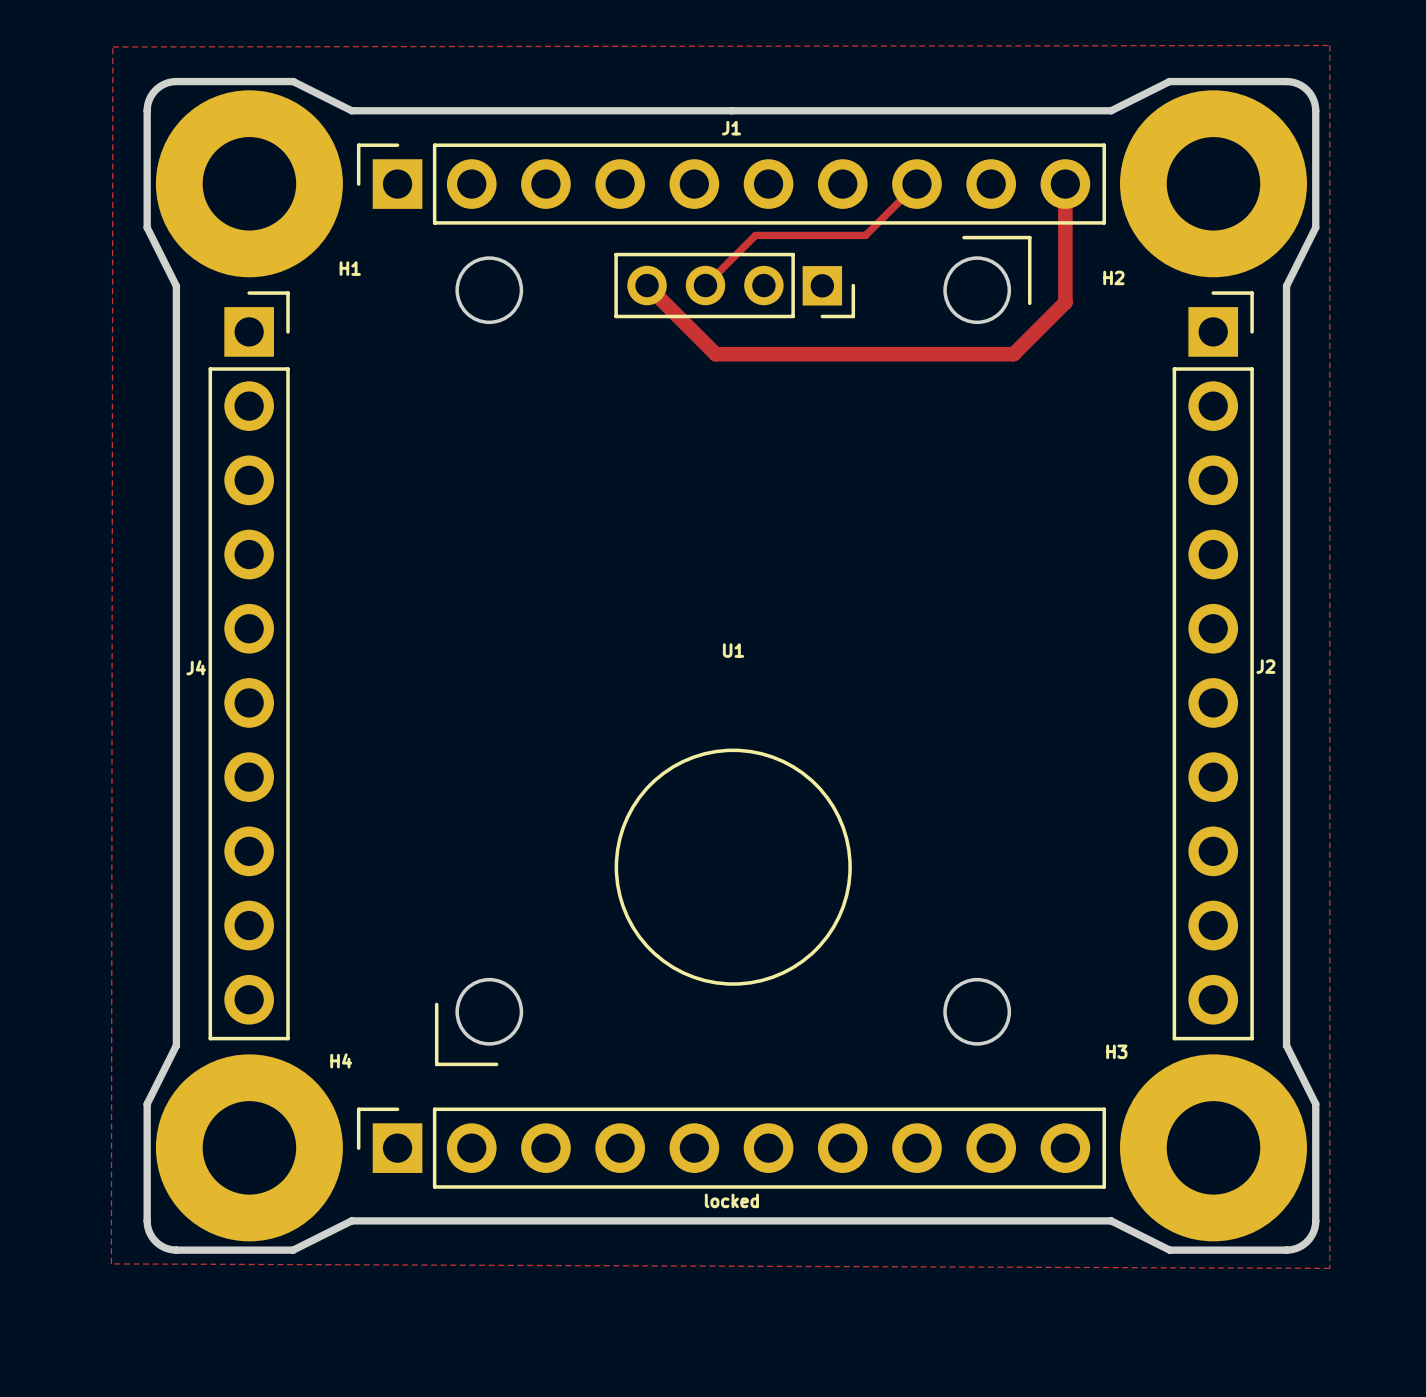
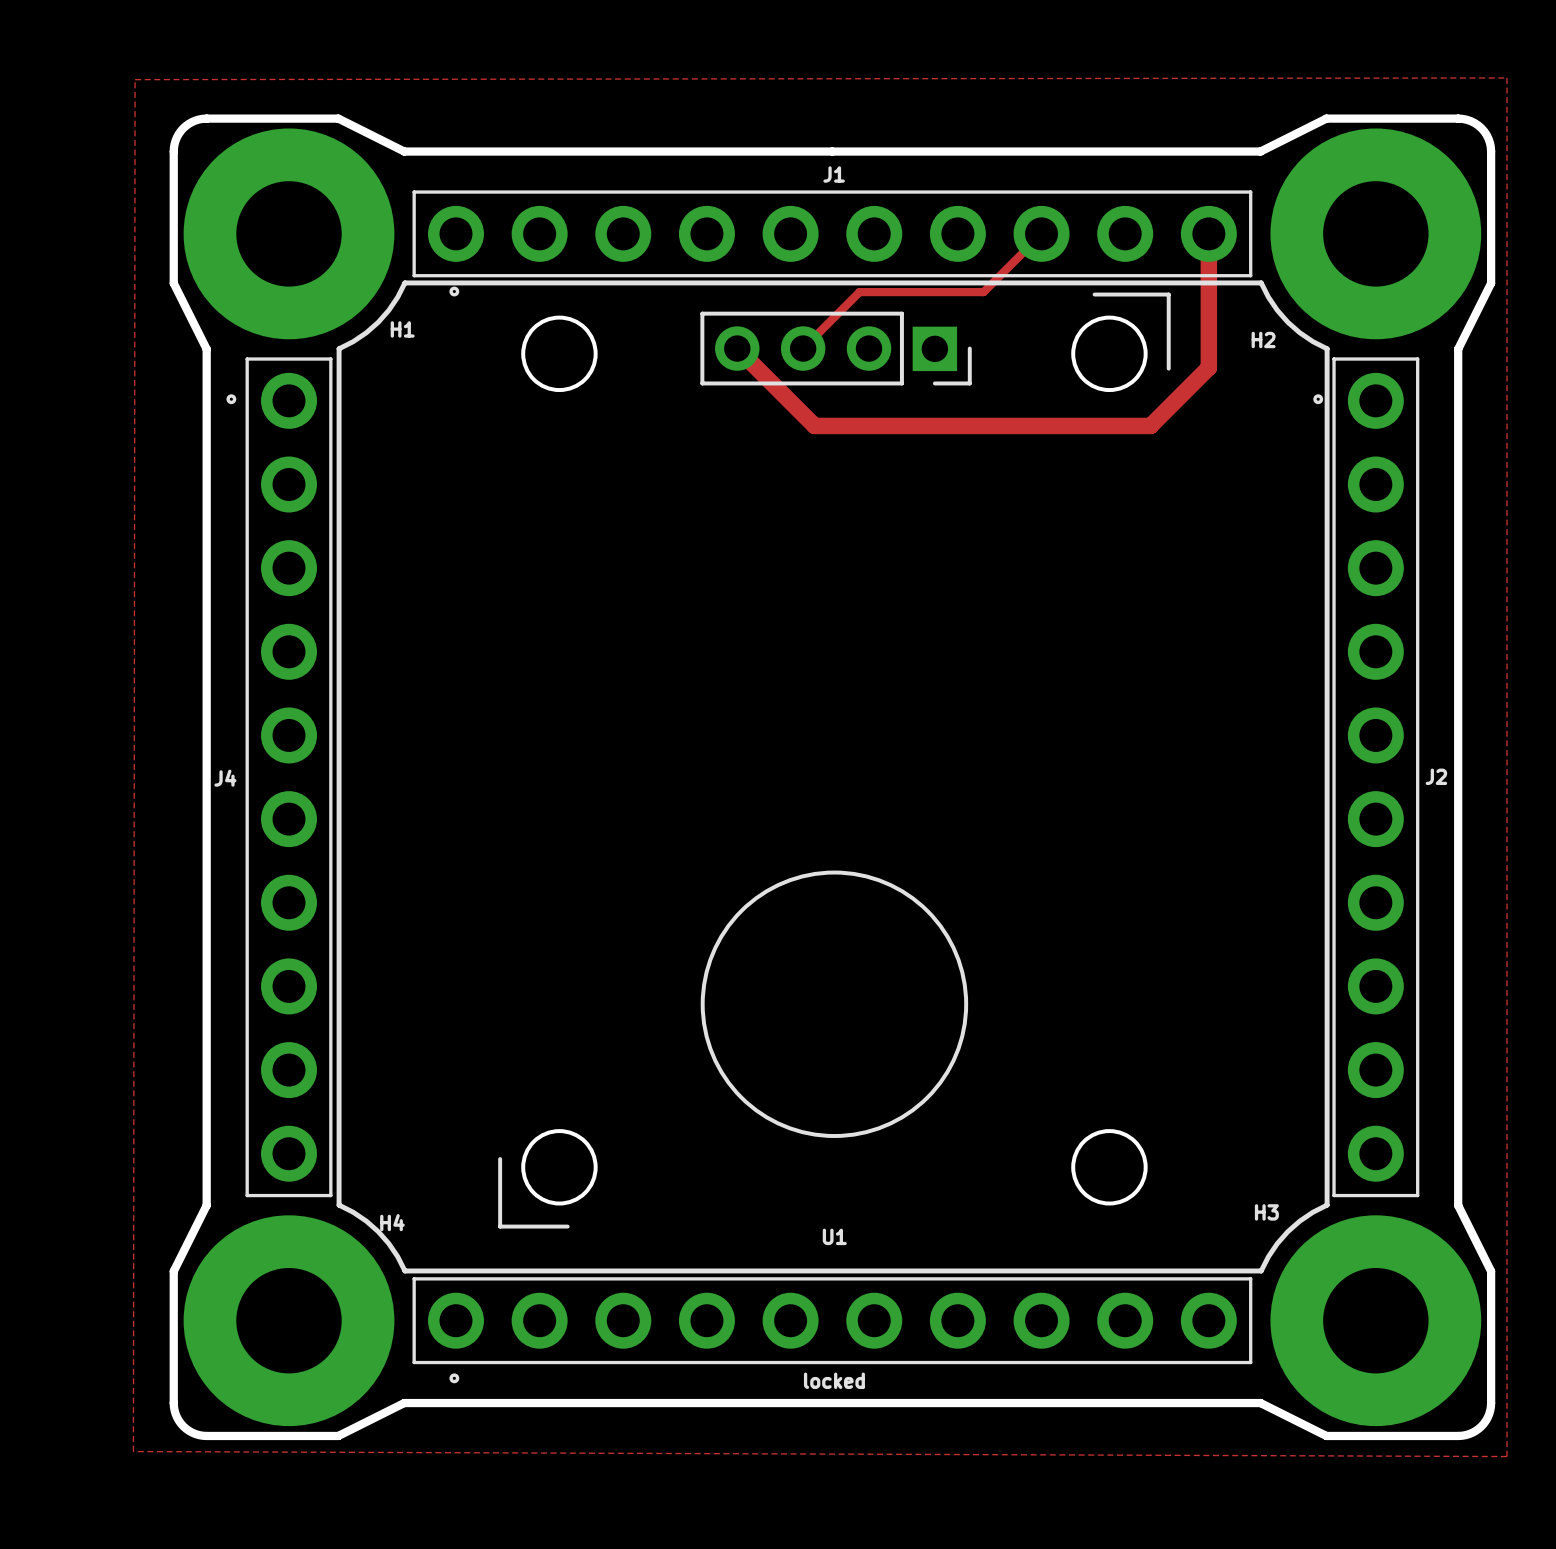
J1 footprint: [356, 143, 1106, 225] -> [412, 190, 1253, 297]
line: none -> (404, 282) (1261, 282) (1277, 310) (1287, 322) (1312, 341) (1327, 348) (1327, 1205) (1299, 1221) (1287, 1231) (1277, 1243) (1261, 1270) (404, 1270) (388, 1243) (378, 1231) (353, 1212) (339, 1205) (339, 348) (366, 332) (378, 322) (388, 310) (404, 282)
J4 footprint: [208, 291, 290, 1041] -> [226, 357, 333, 1198]
J2 footprint: [1172, 291, 1254, 1041] -> [1313, 357, 1420, 1198]
U1 name position: U1 (733, 650) -> U1 (834, 1236)
locked footprint: [356, 1107, 1106, 1189] -> [412, 1277, 1253, 1384]

